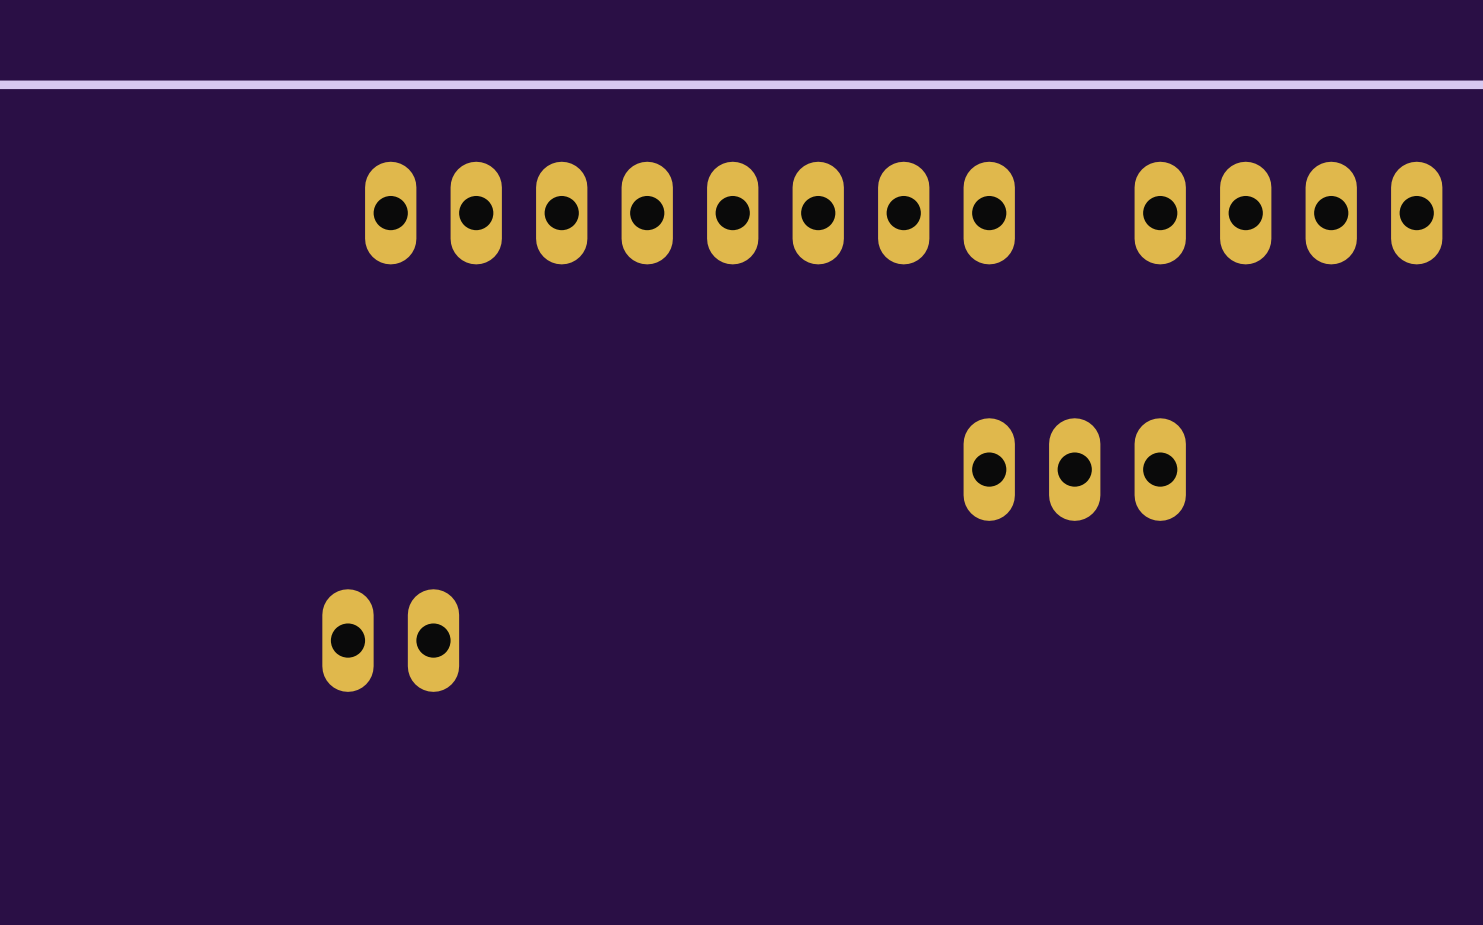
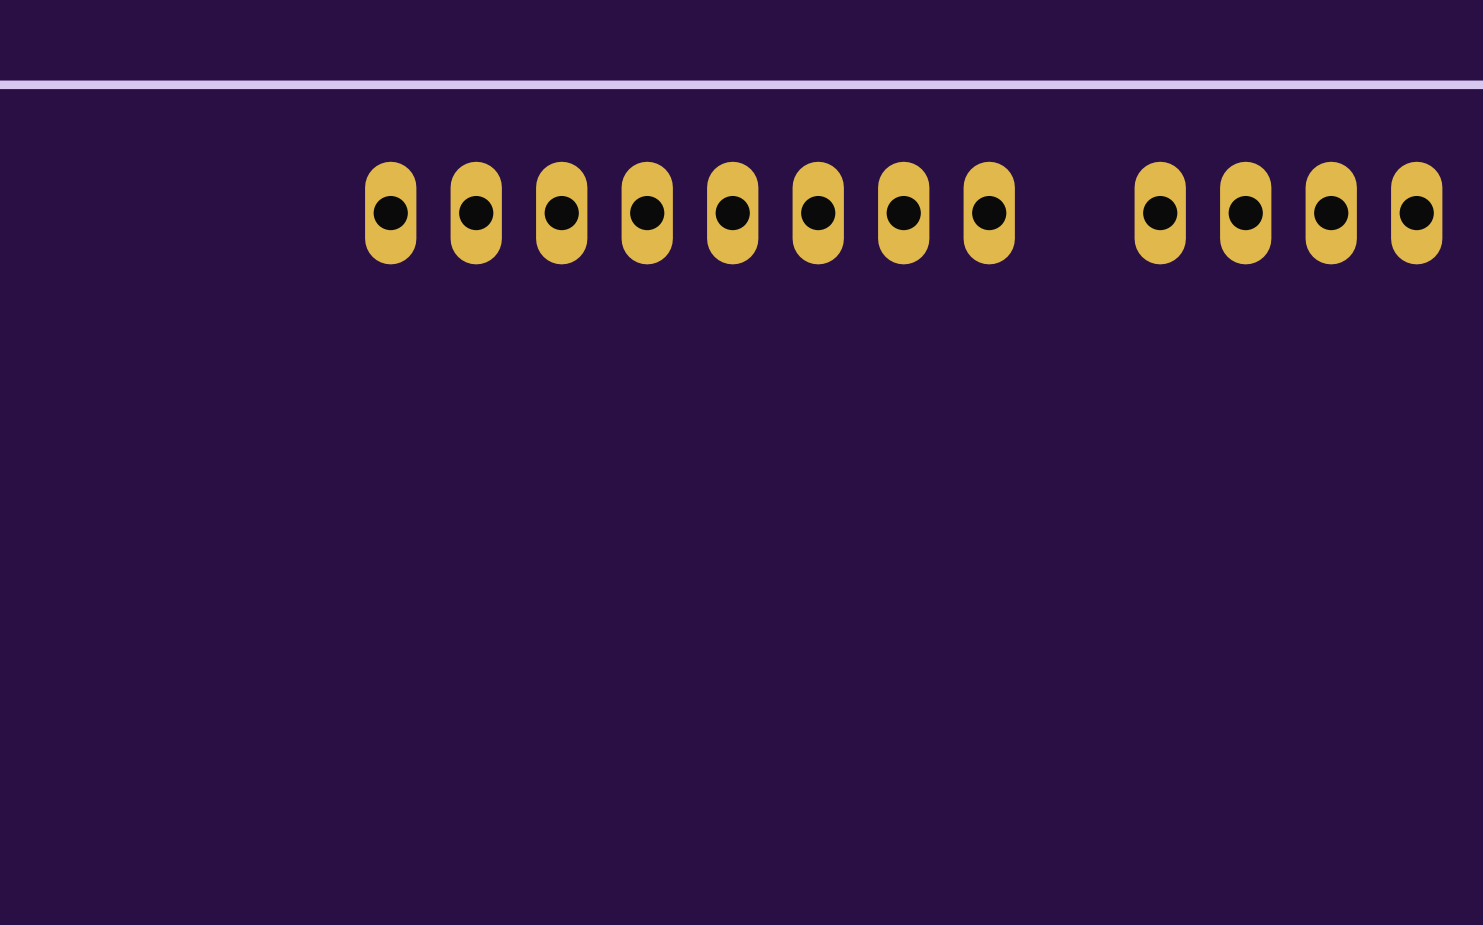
part: (1074, 469) -> none
part: (390, 640) -> none

